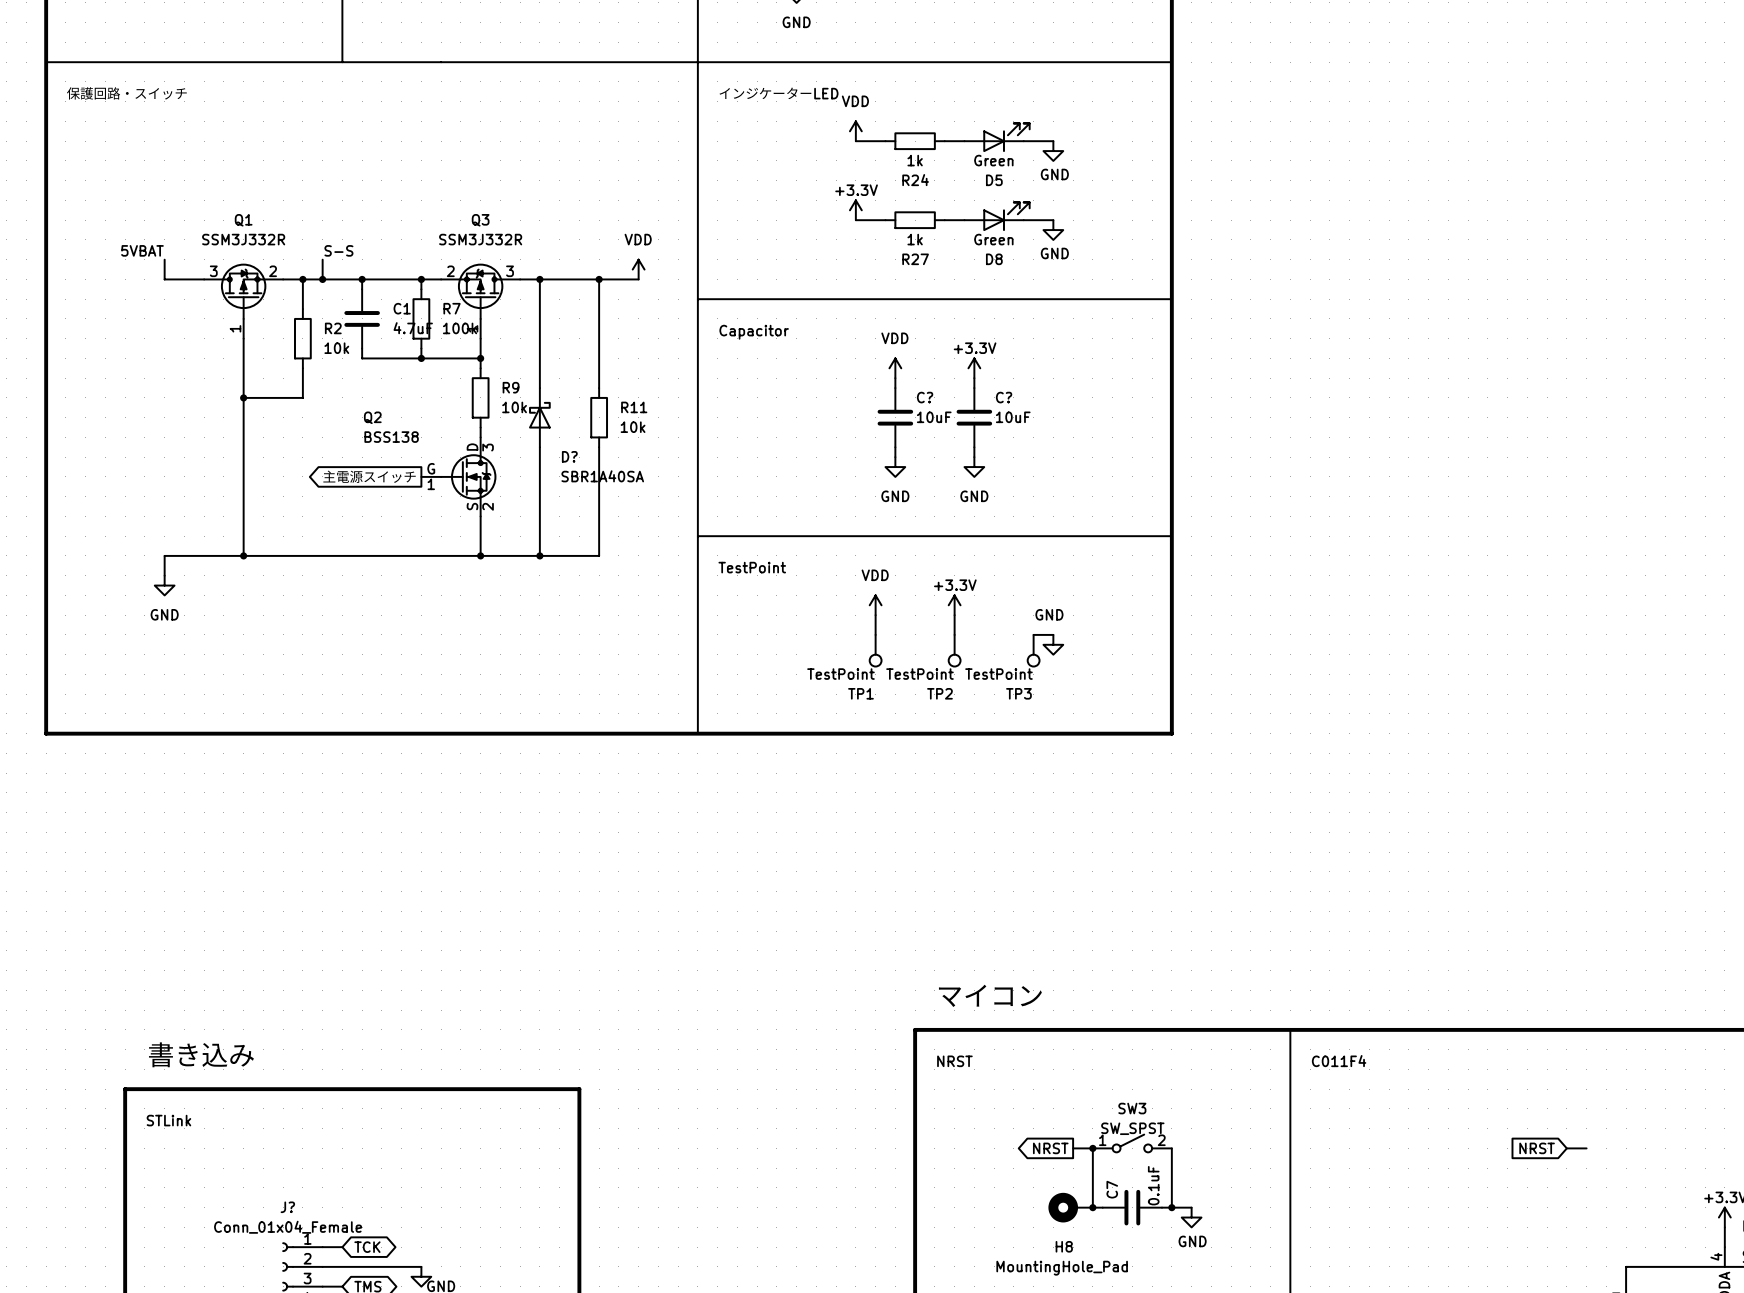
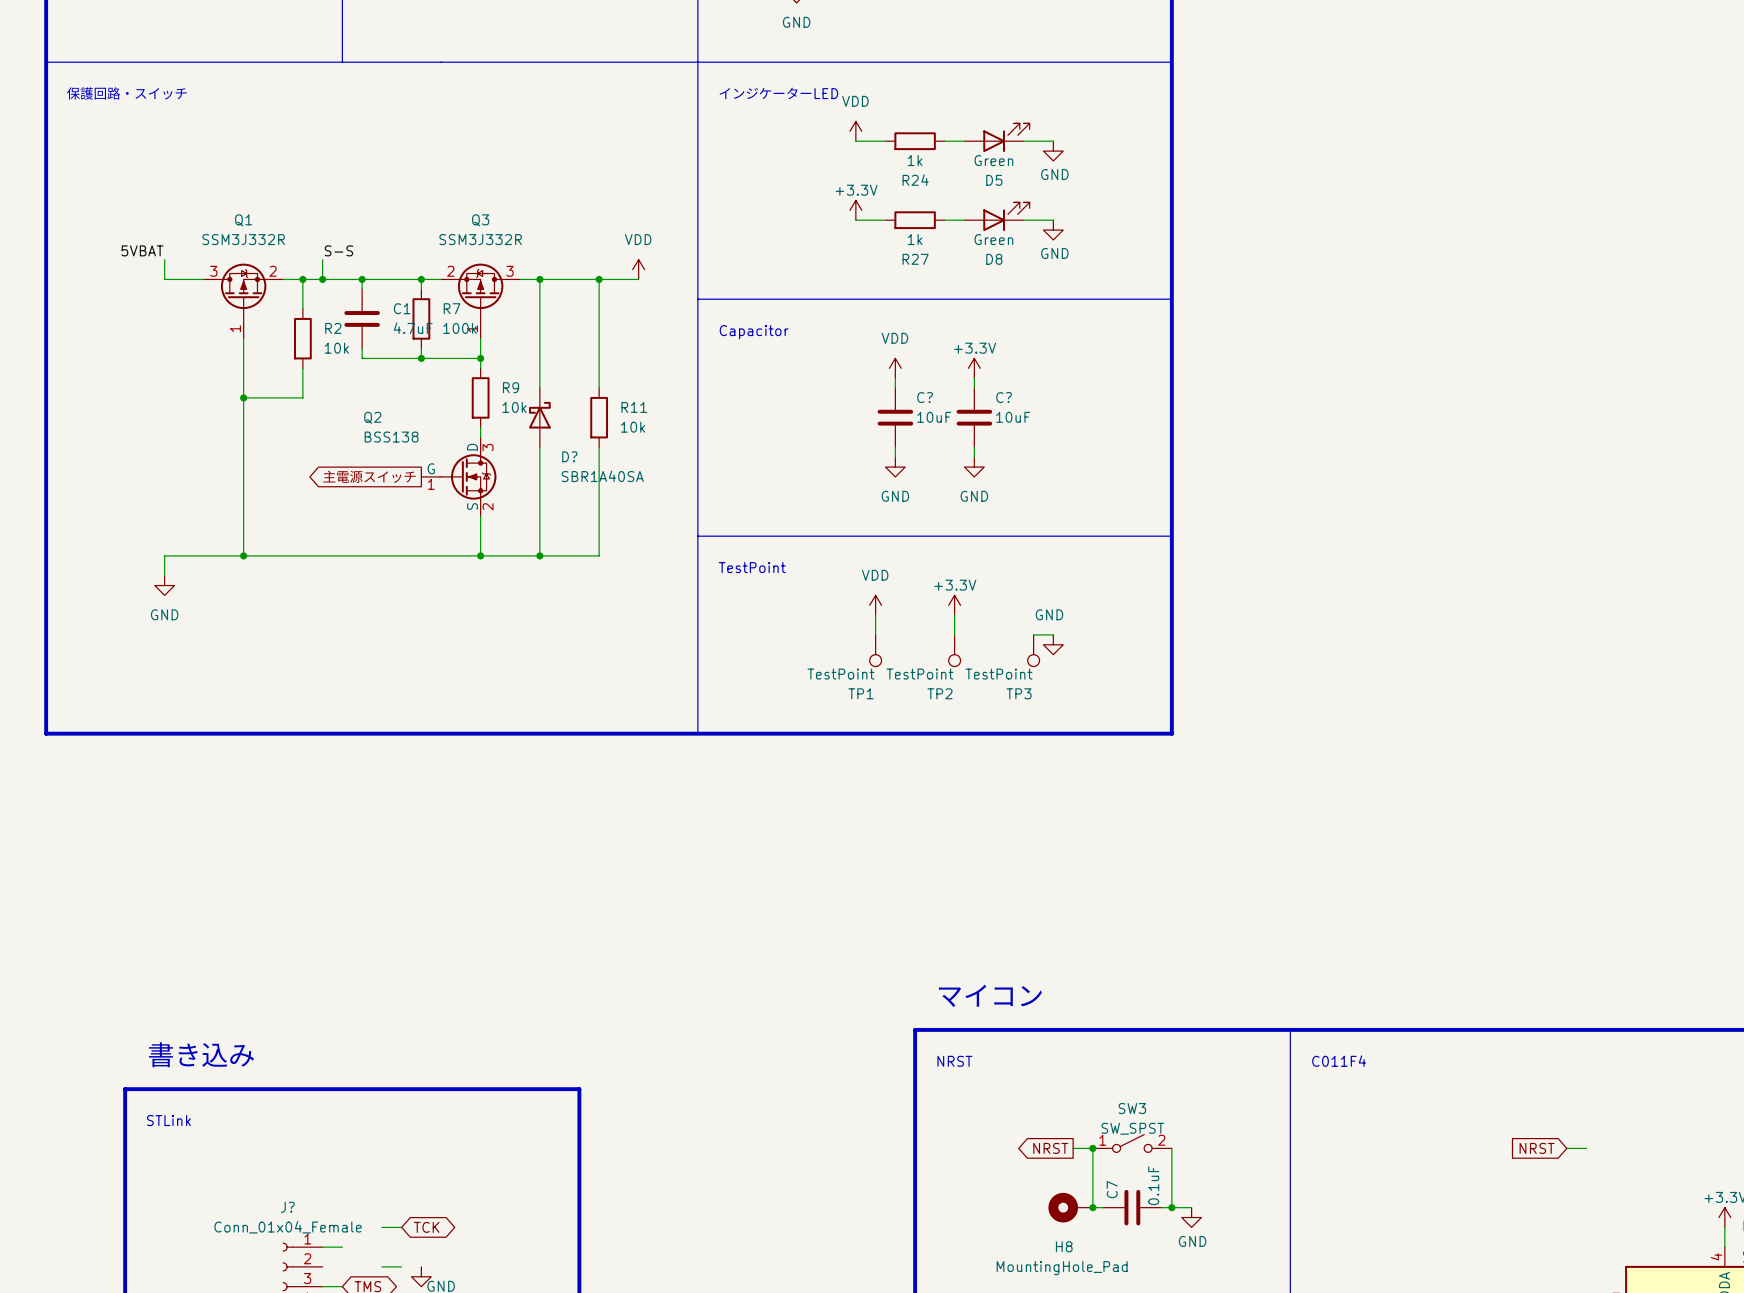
global label position: TCK (367, 1247) -> TCK (426, 1227)
wire: (322, 1266) (381, 1266) -> none
wire: (401, 1266) (421, 1266) -> (381, 1227) (401, 1227)

